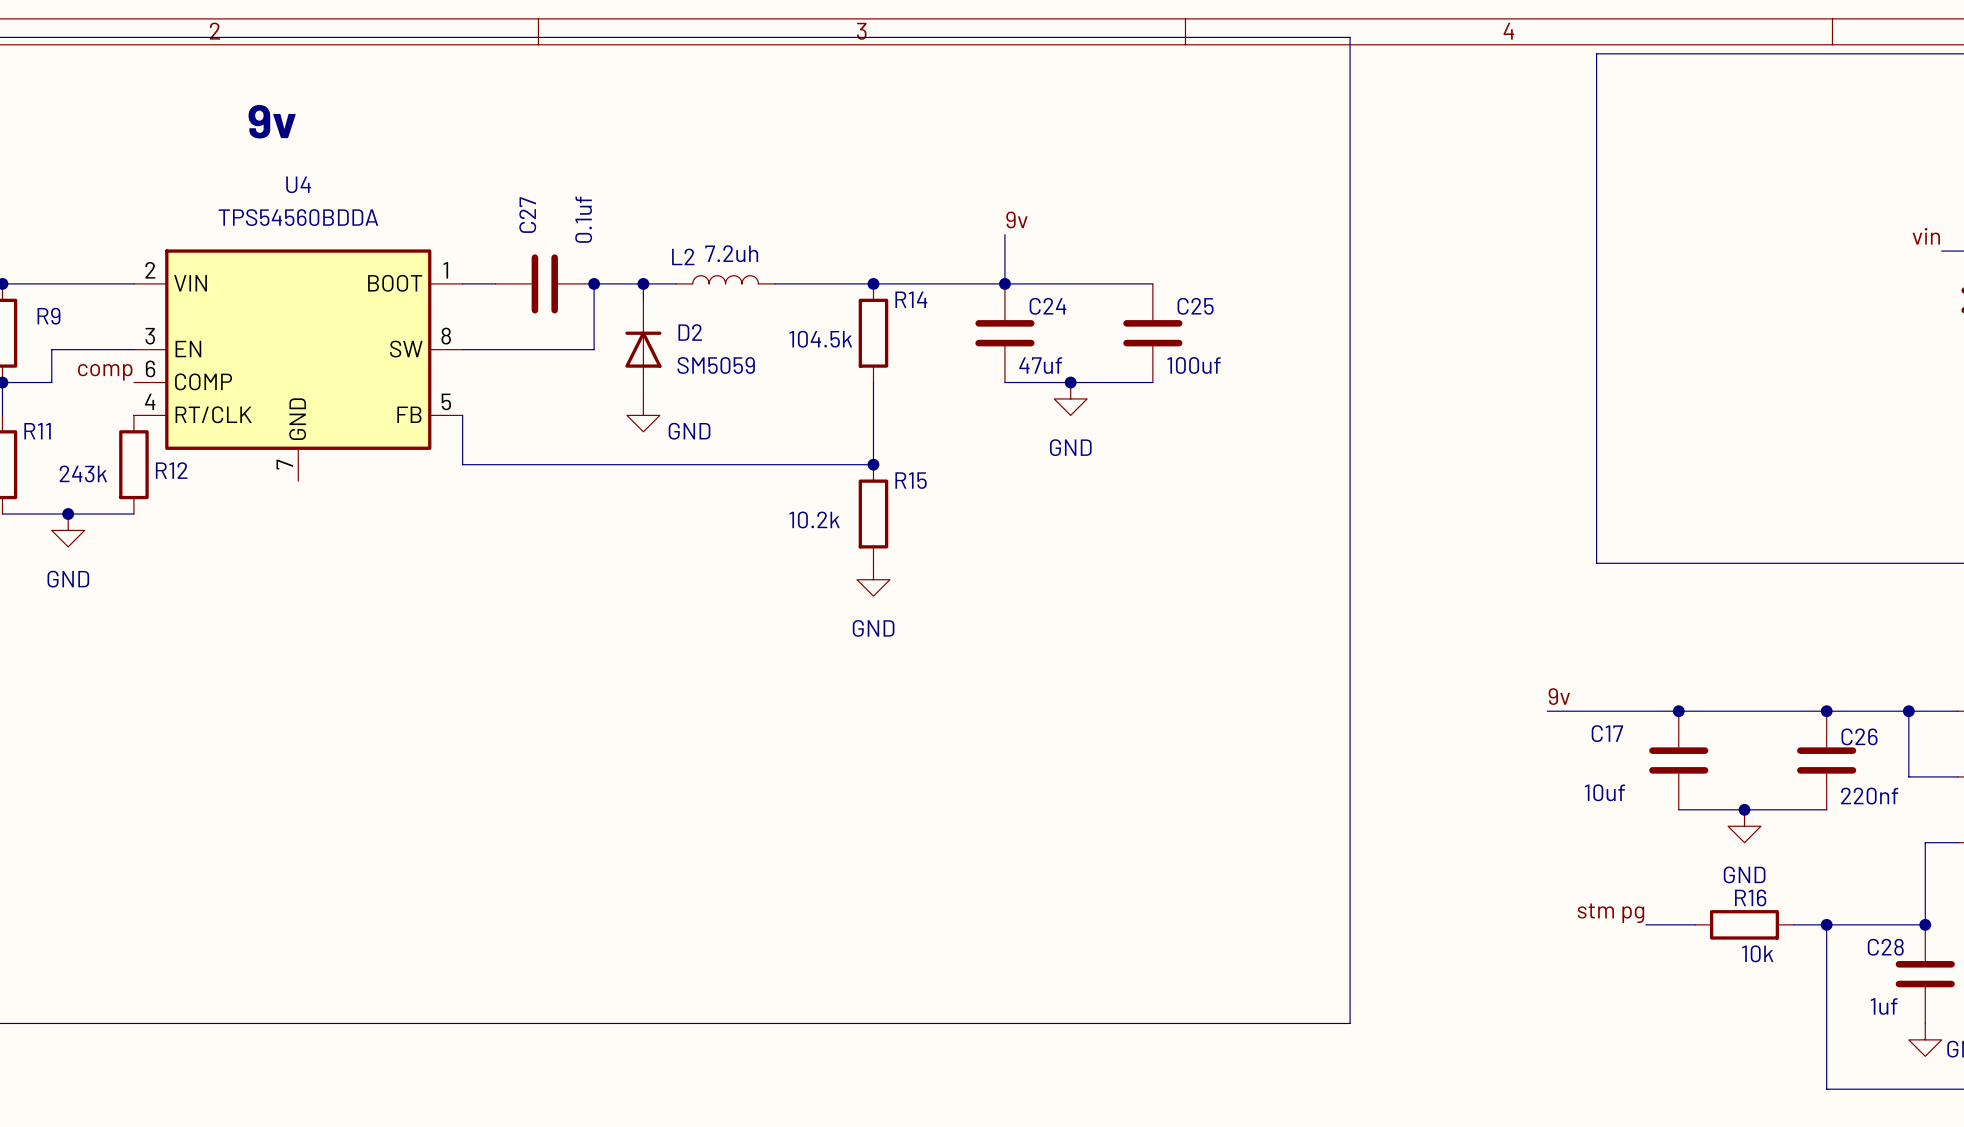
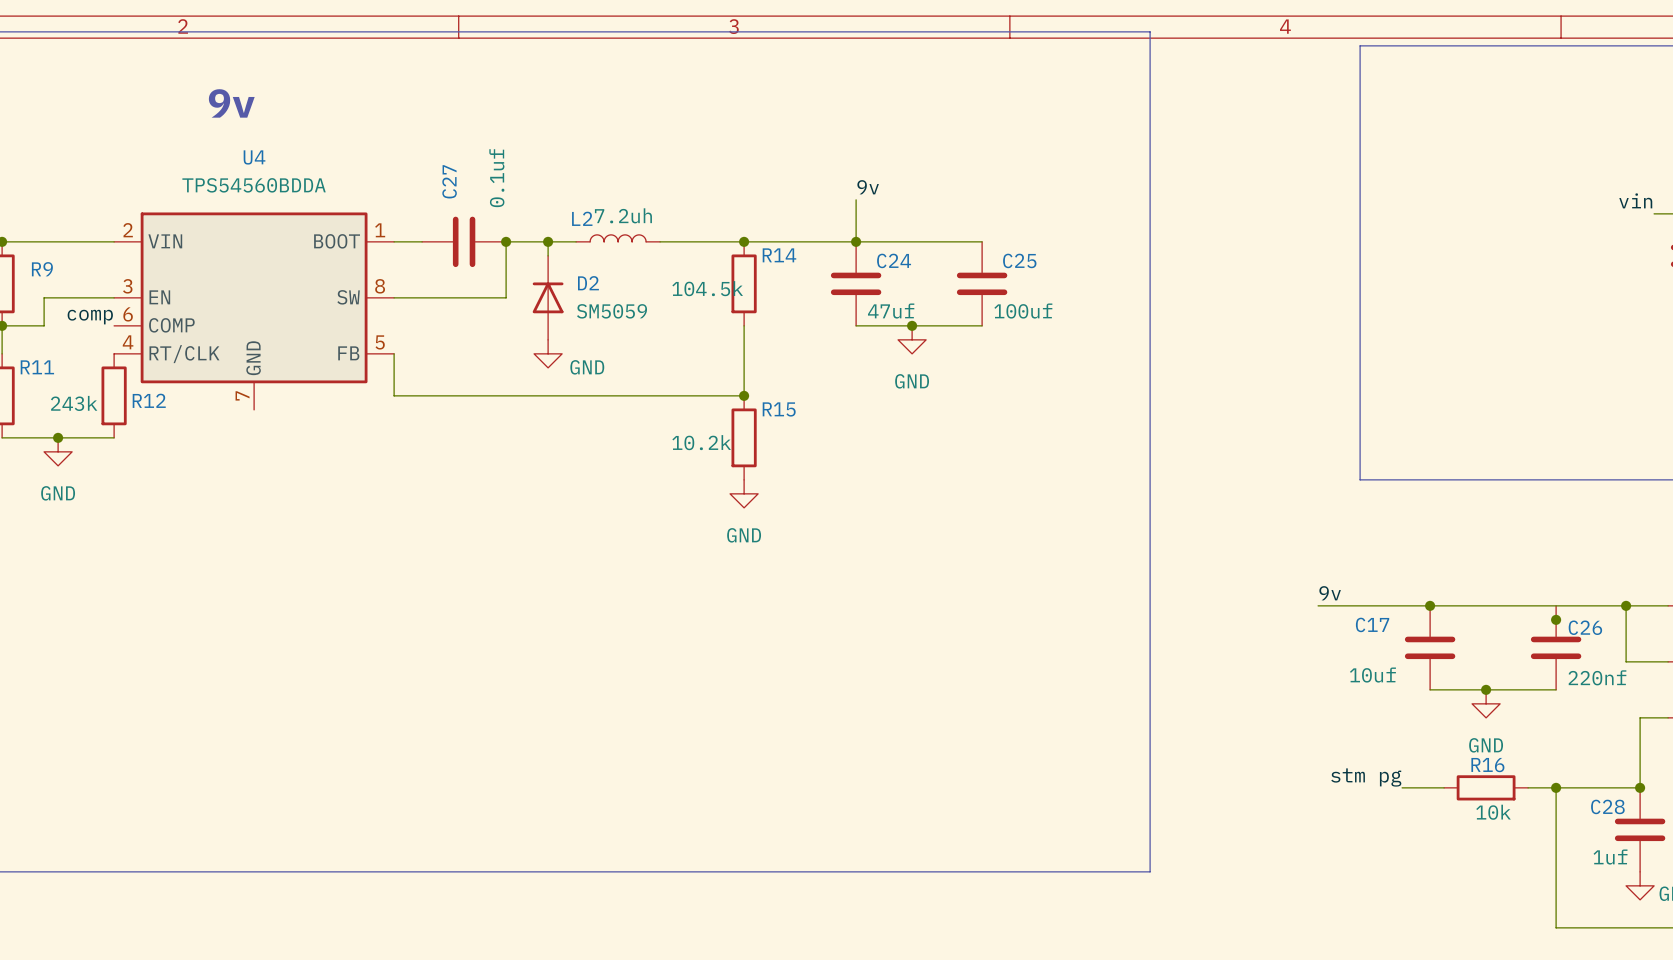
junction position: (1826, 711) -> (1556, 619)

